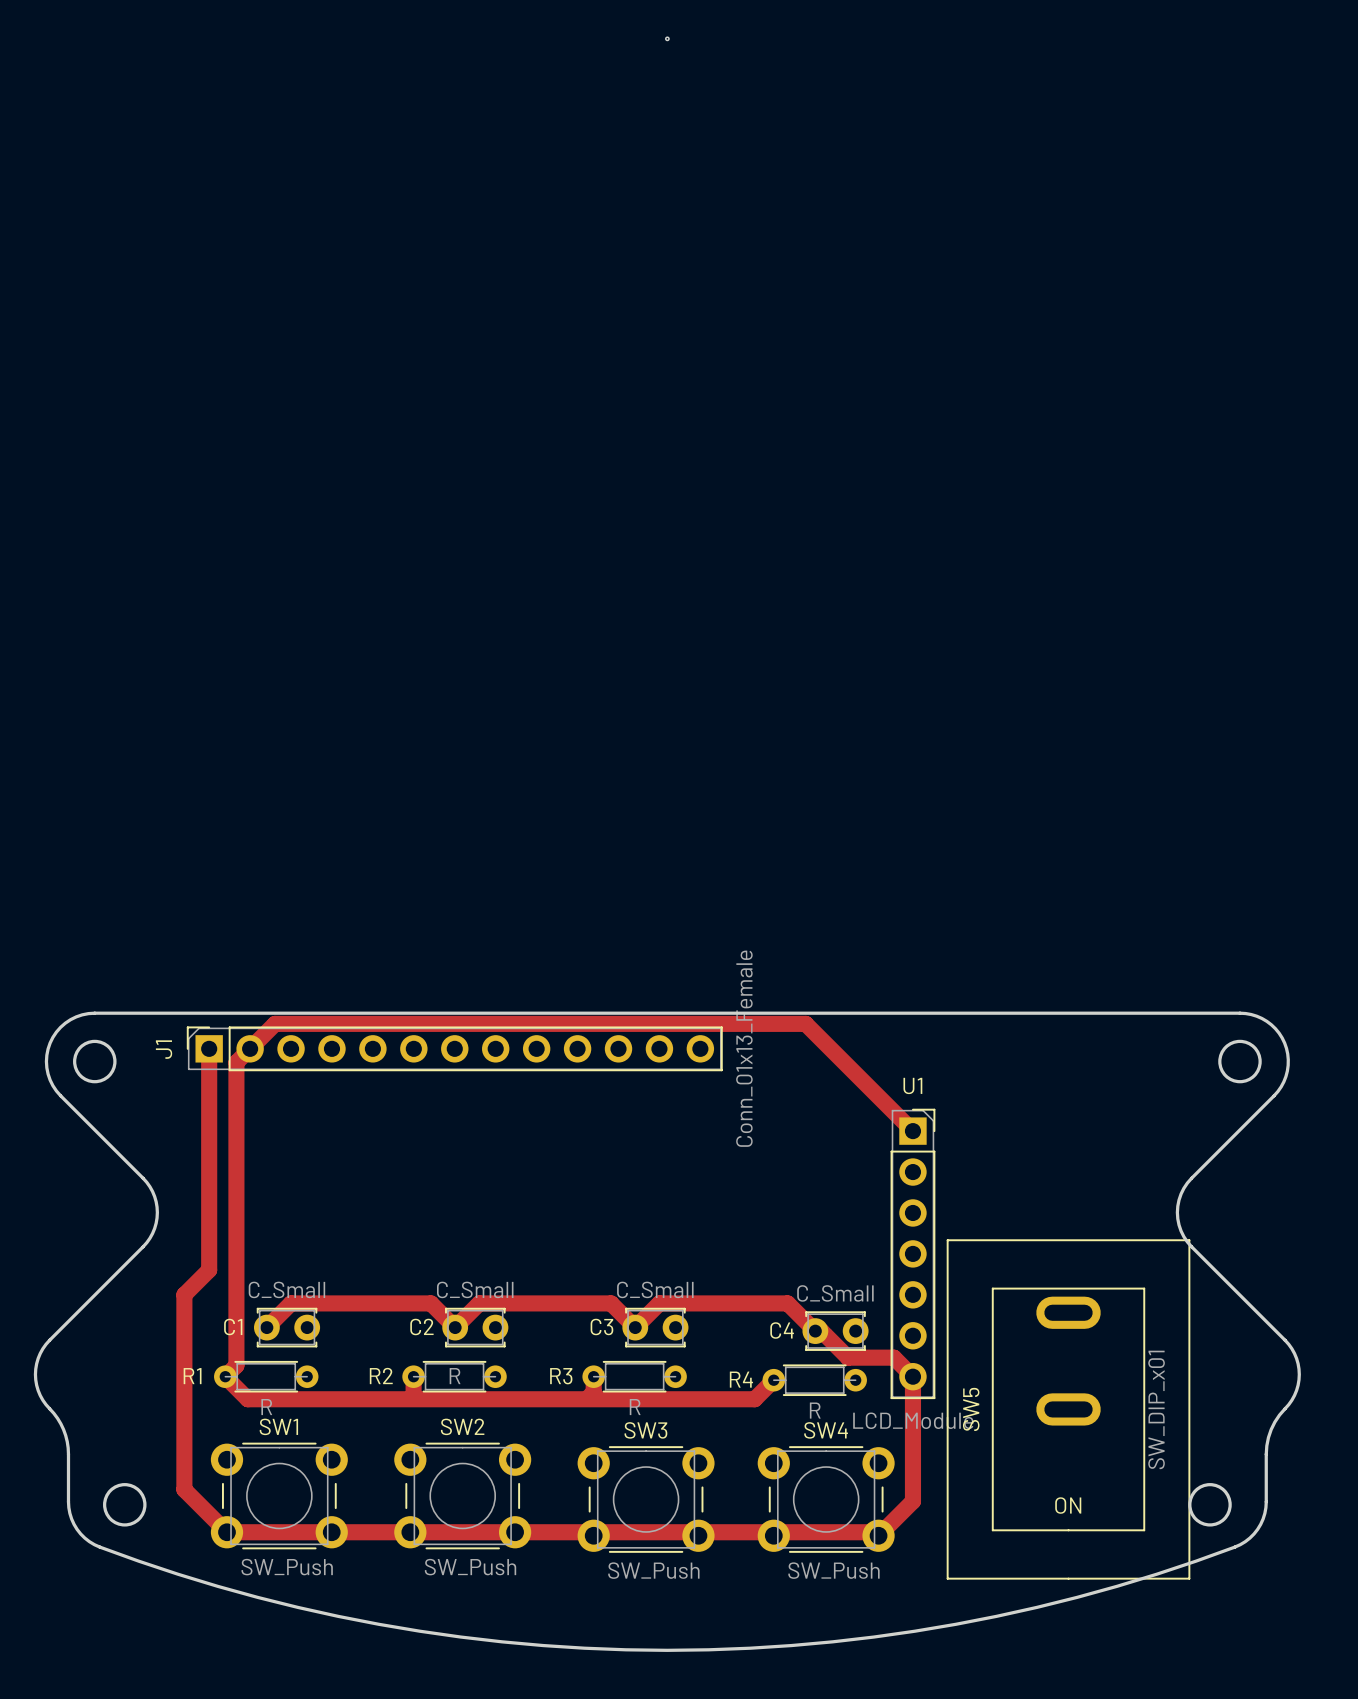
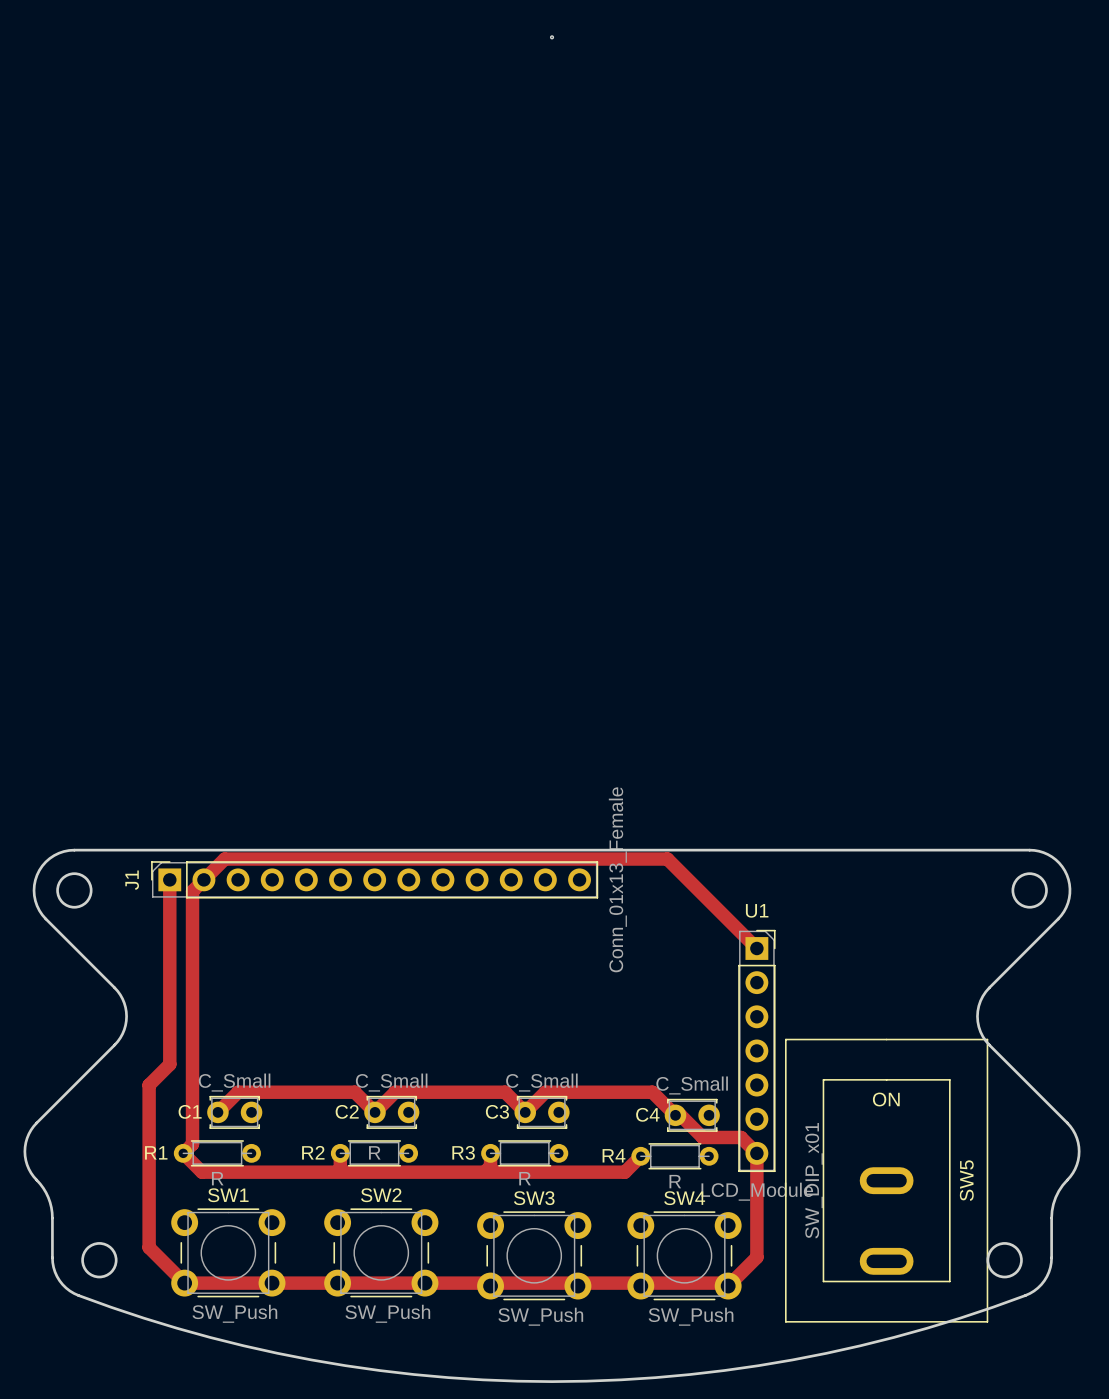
SW5 rotation: 0° (1068, 1409) -> 180° (886, 1180)

